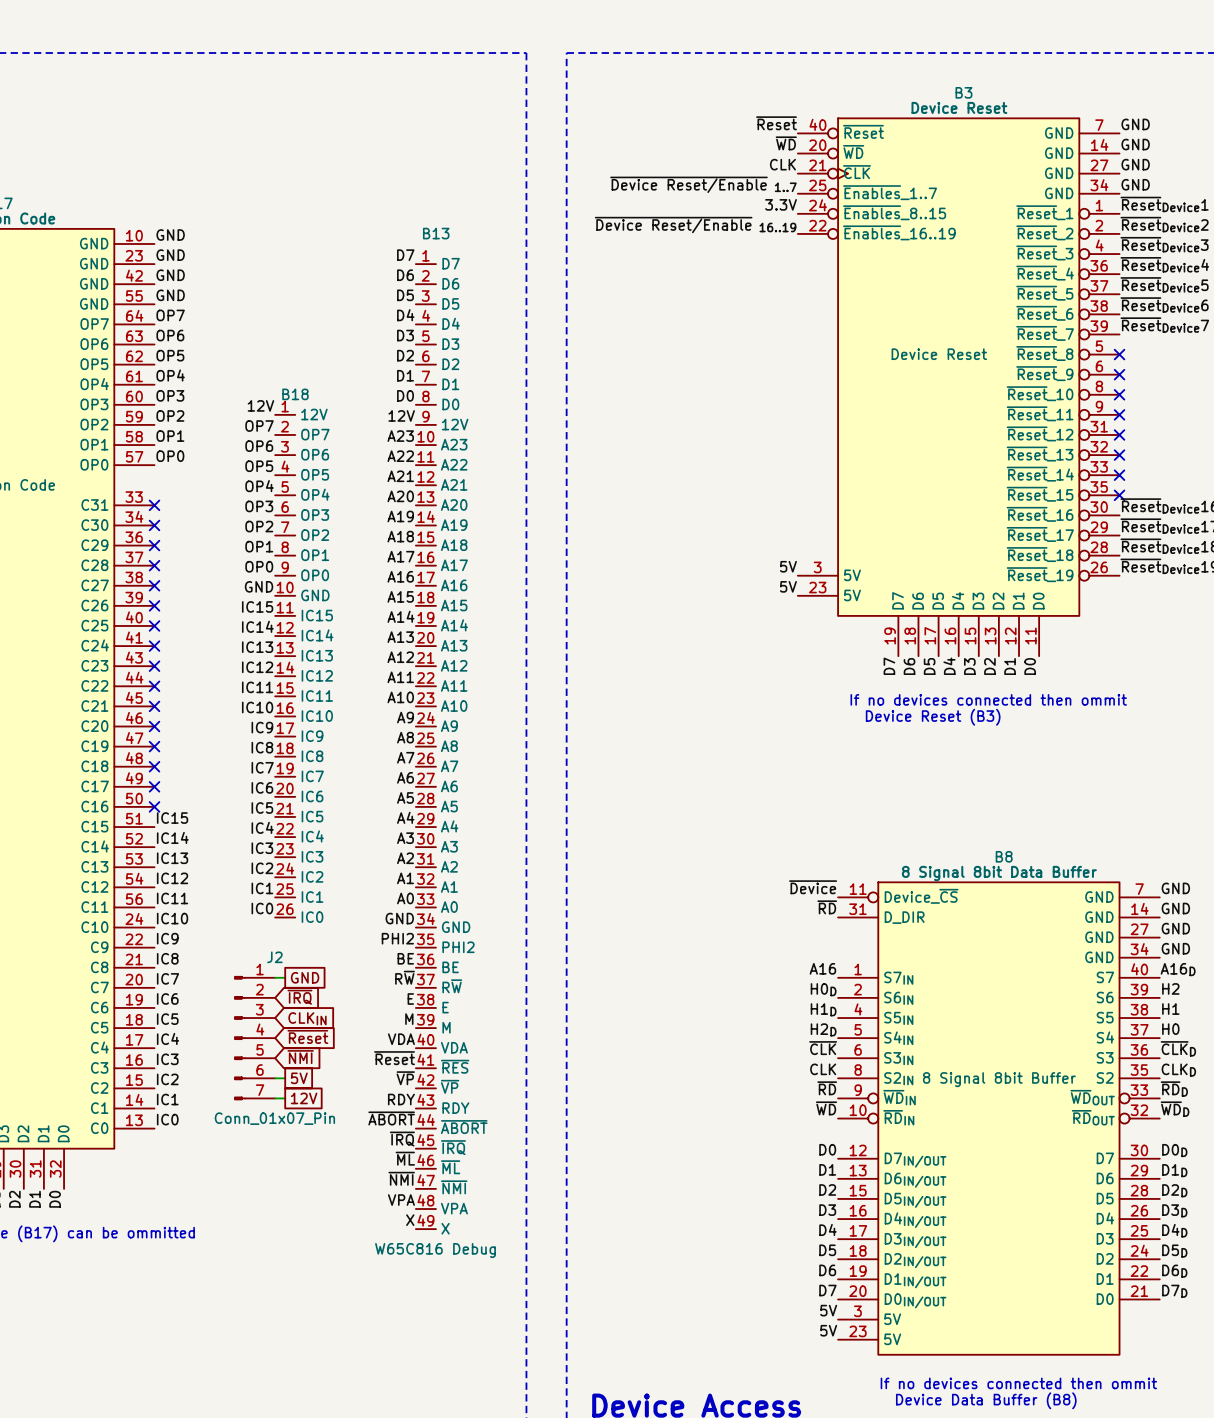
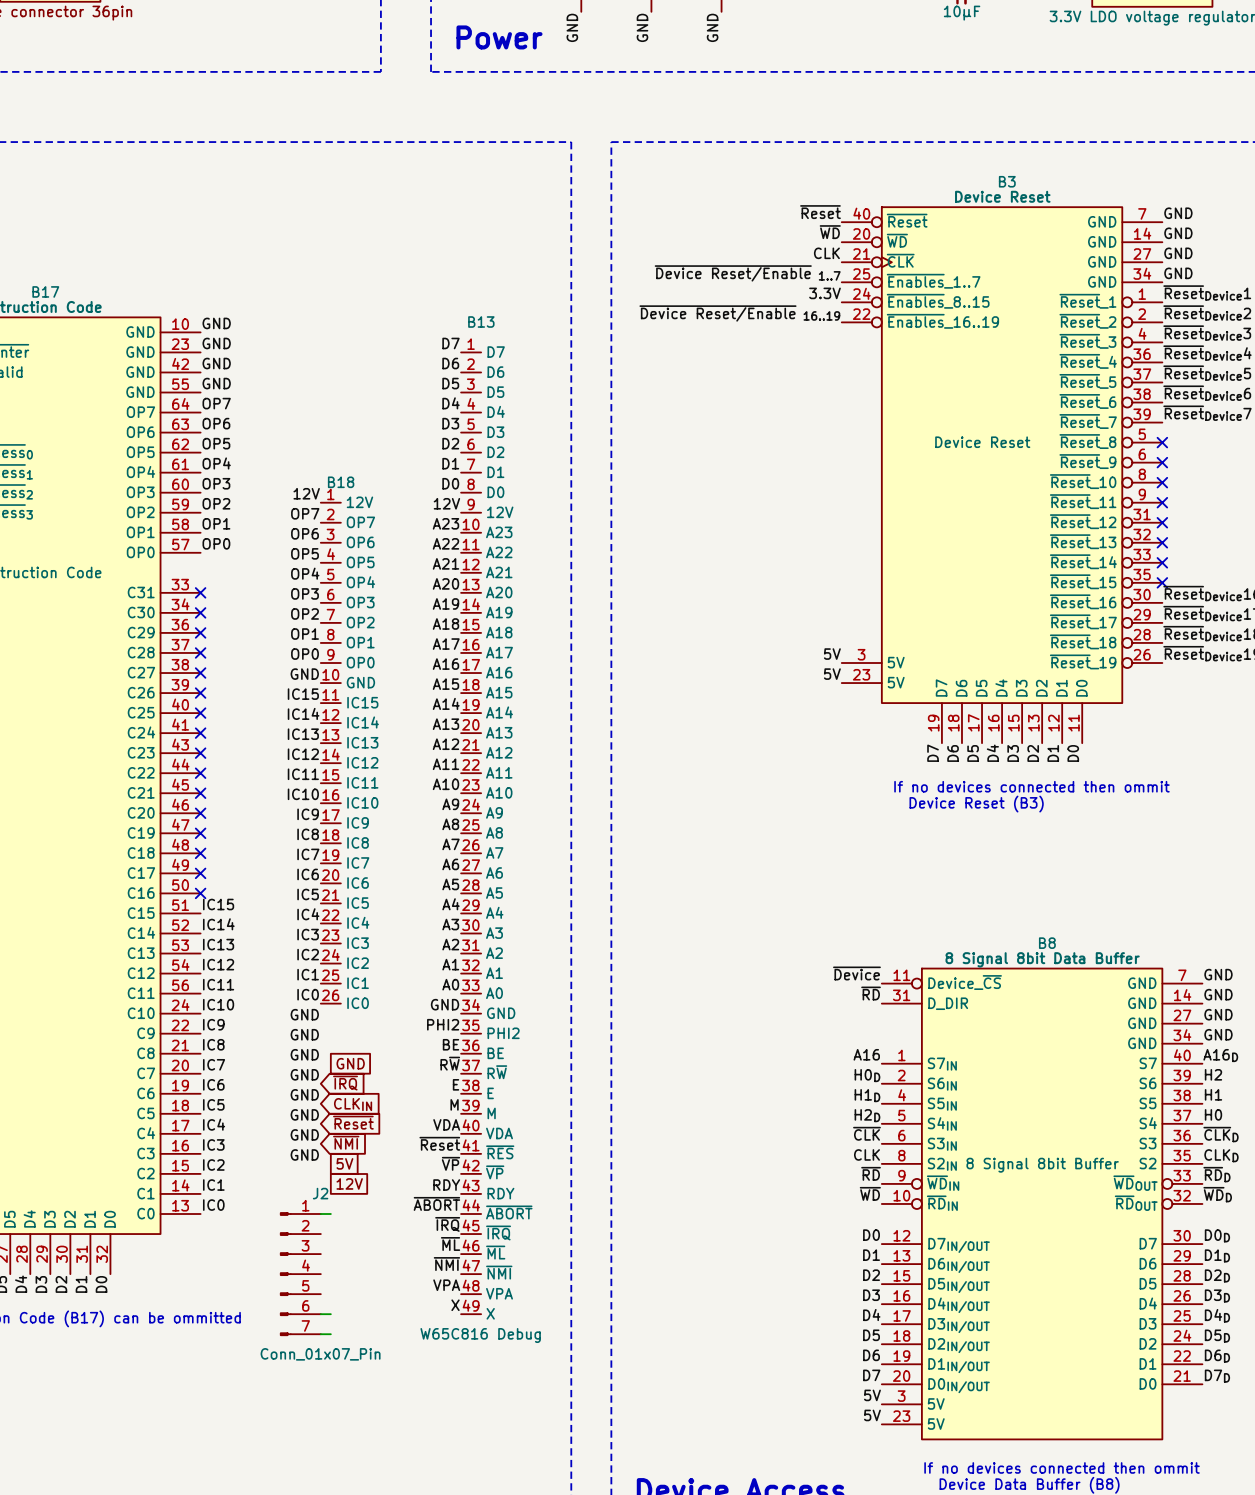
label: none -> GND (304, 1014)
label: none -> GND (304, 1034)
label: none -> GND (304, 1054)
wire: (275, 977) (285, 977) -> (320, 1214) (330, 1214)
label: none -> GND (304, 1074)
label: none -> GND (304, 1094)
label: none -> GND (304, 1114)
J2 position: (254, 1038) -> (300, 1274)
label: none -> GND (304, 1134)
label: none -> GND (304, 1154)
wire: (275, 1078) (285, 1078) -> (320, 1314) (330, 1314)
wire: (275, 1098) (285, 1098) -> (320, 1334) (330, 1334)

